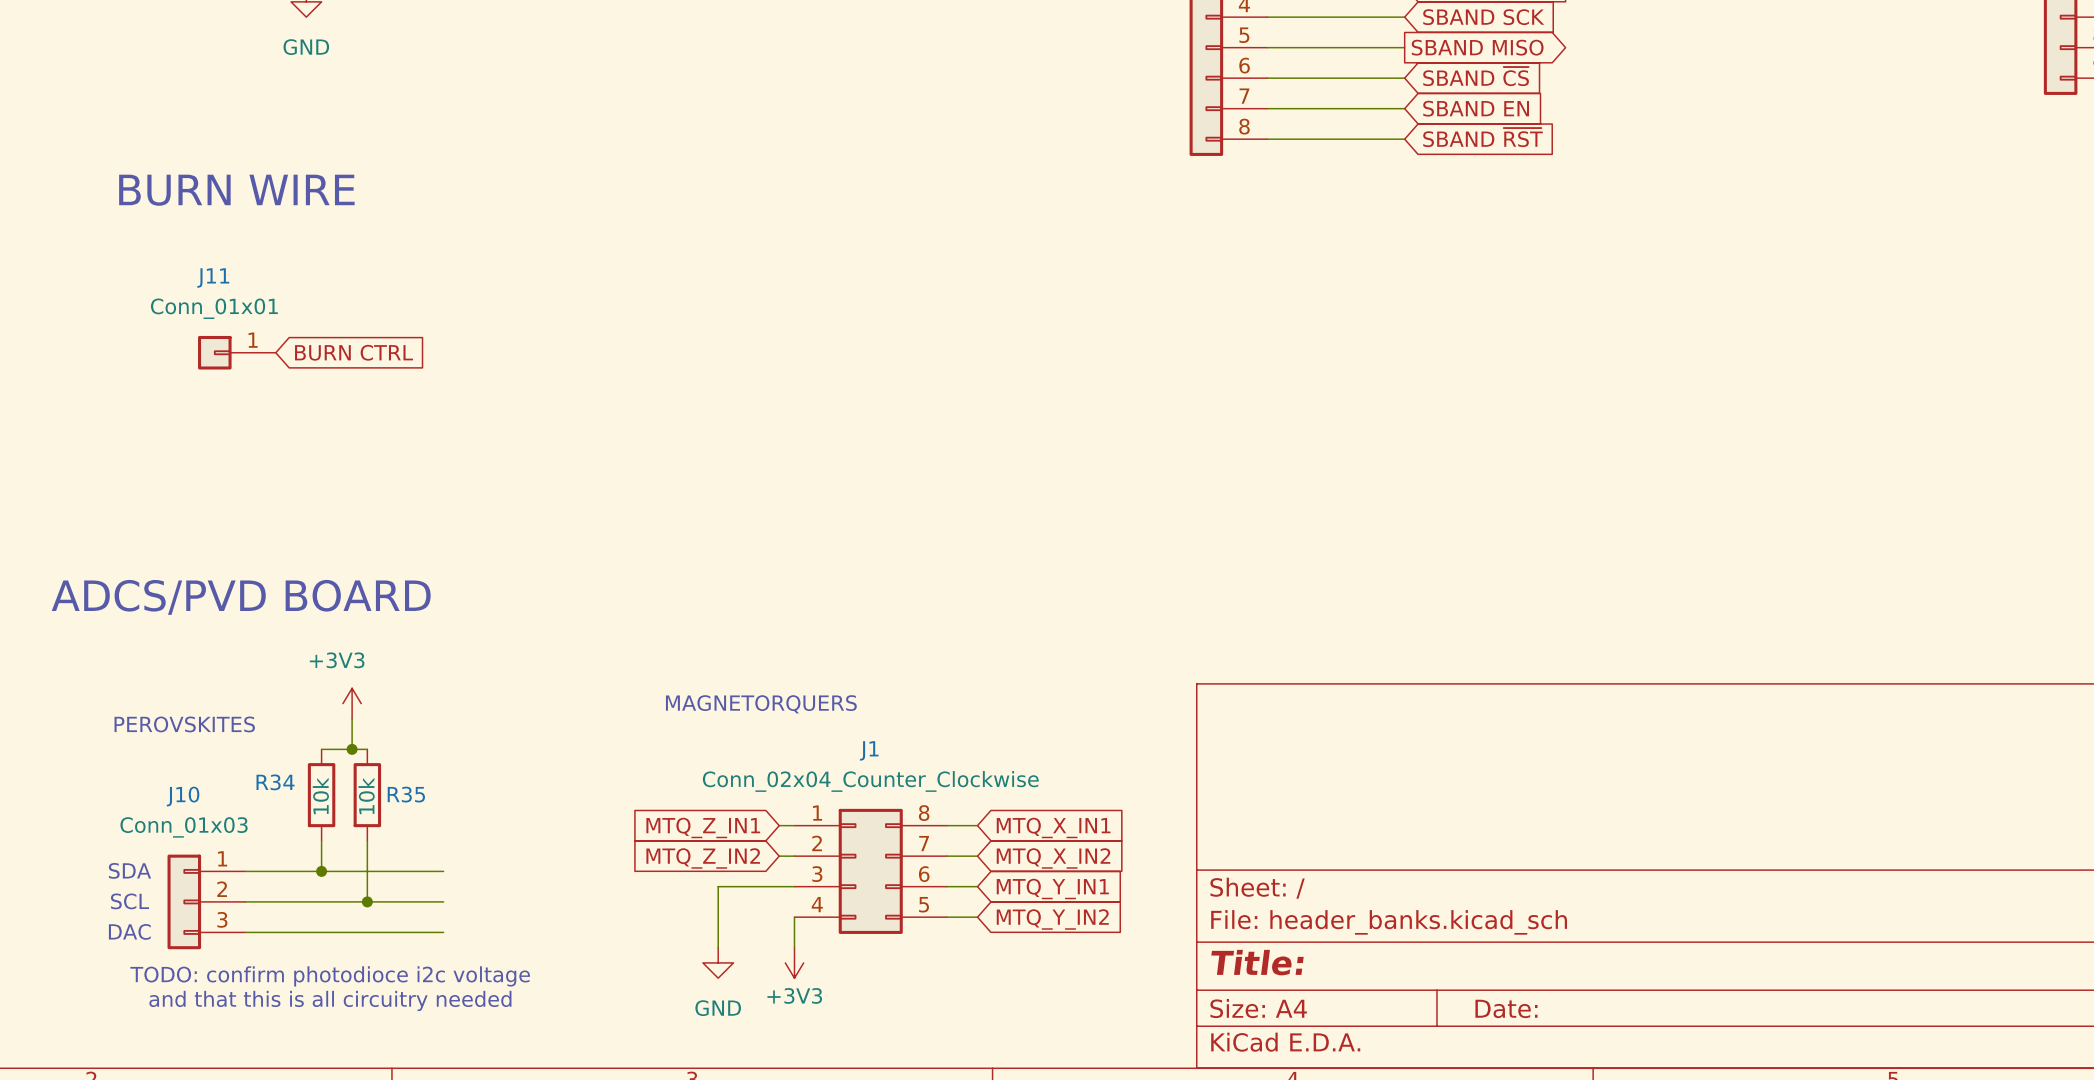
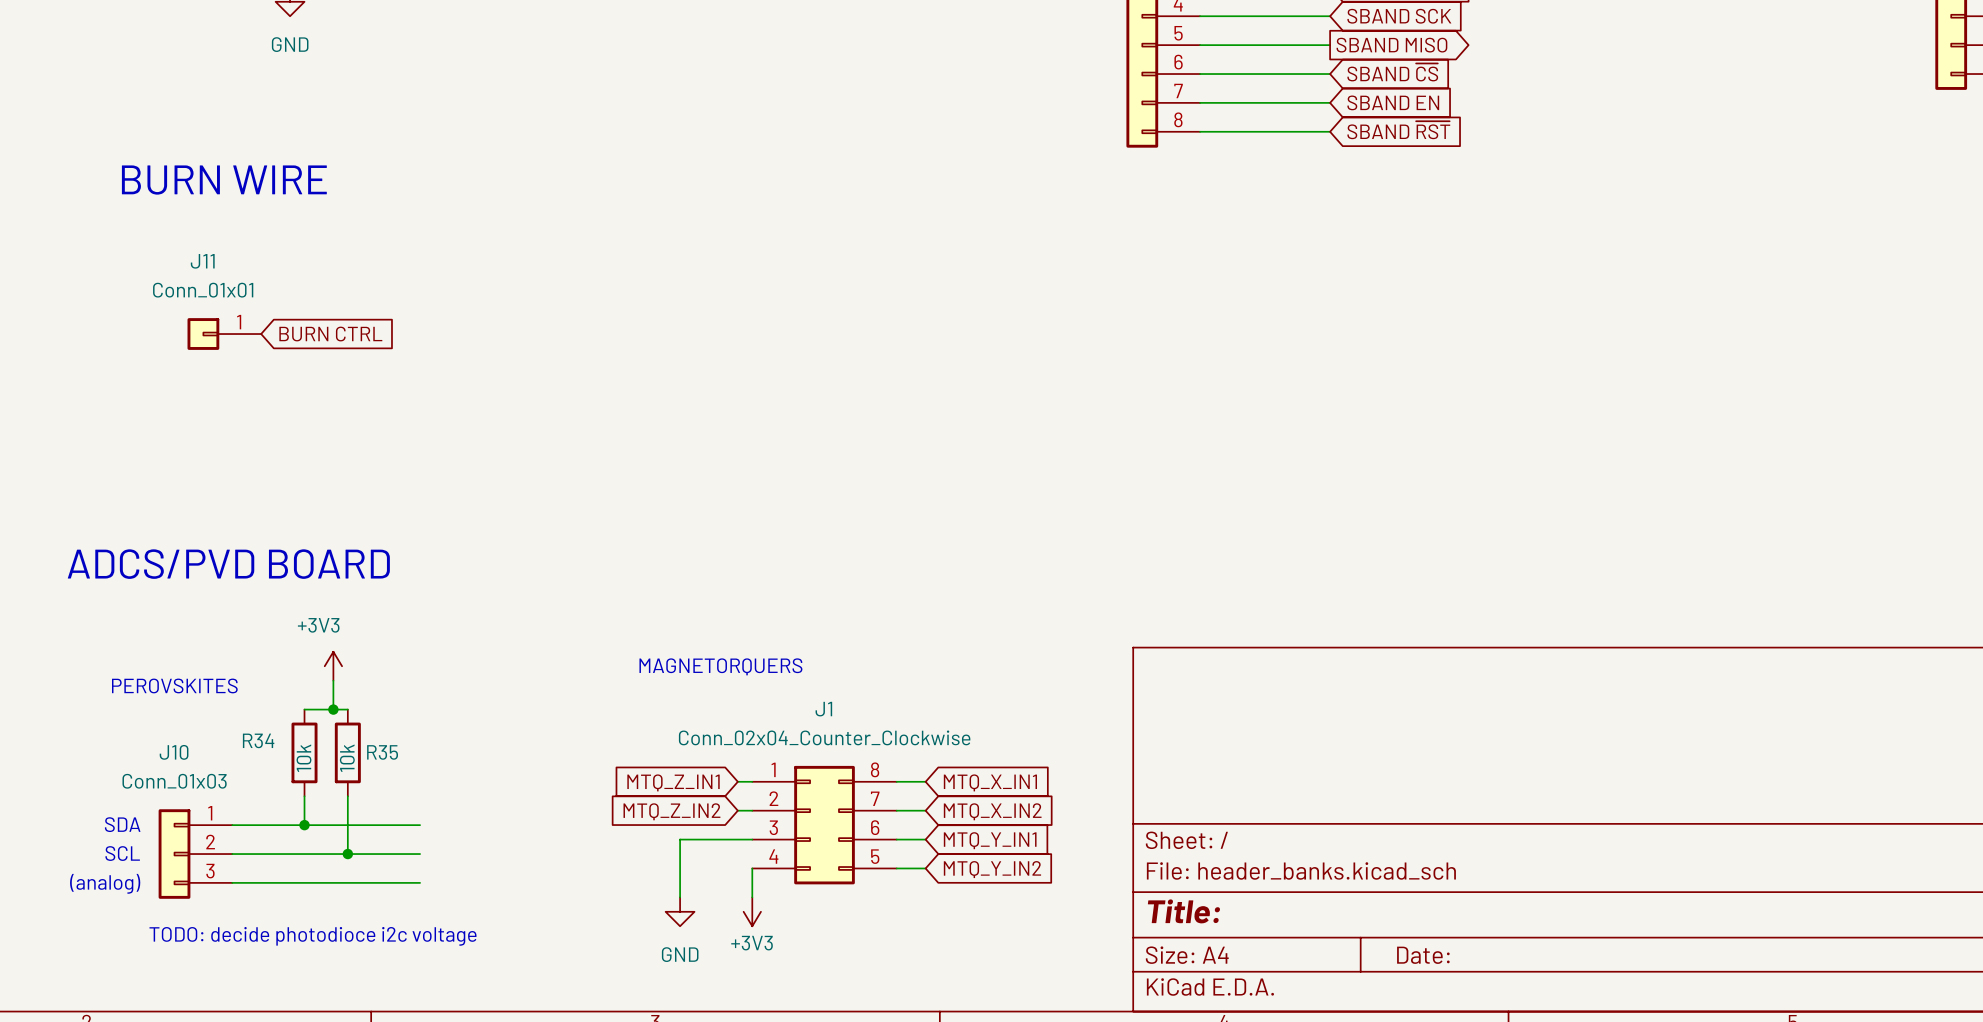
text: DAC (129, 931) -> none
text: none -> (analog) (105, 883)
text: TODO: confirm photodioce i2c voltage (330, 976) -> TODO: decide photodioce i2c voltage (312, 936)
text: and that this is all circuitry needed (330, 1000) -> none

